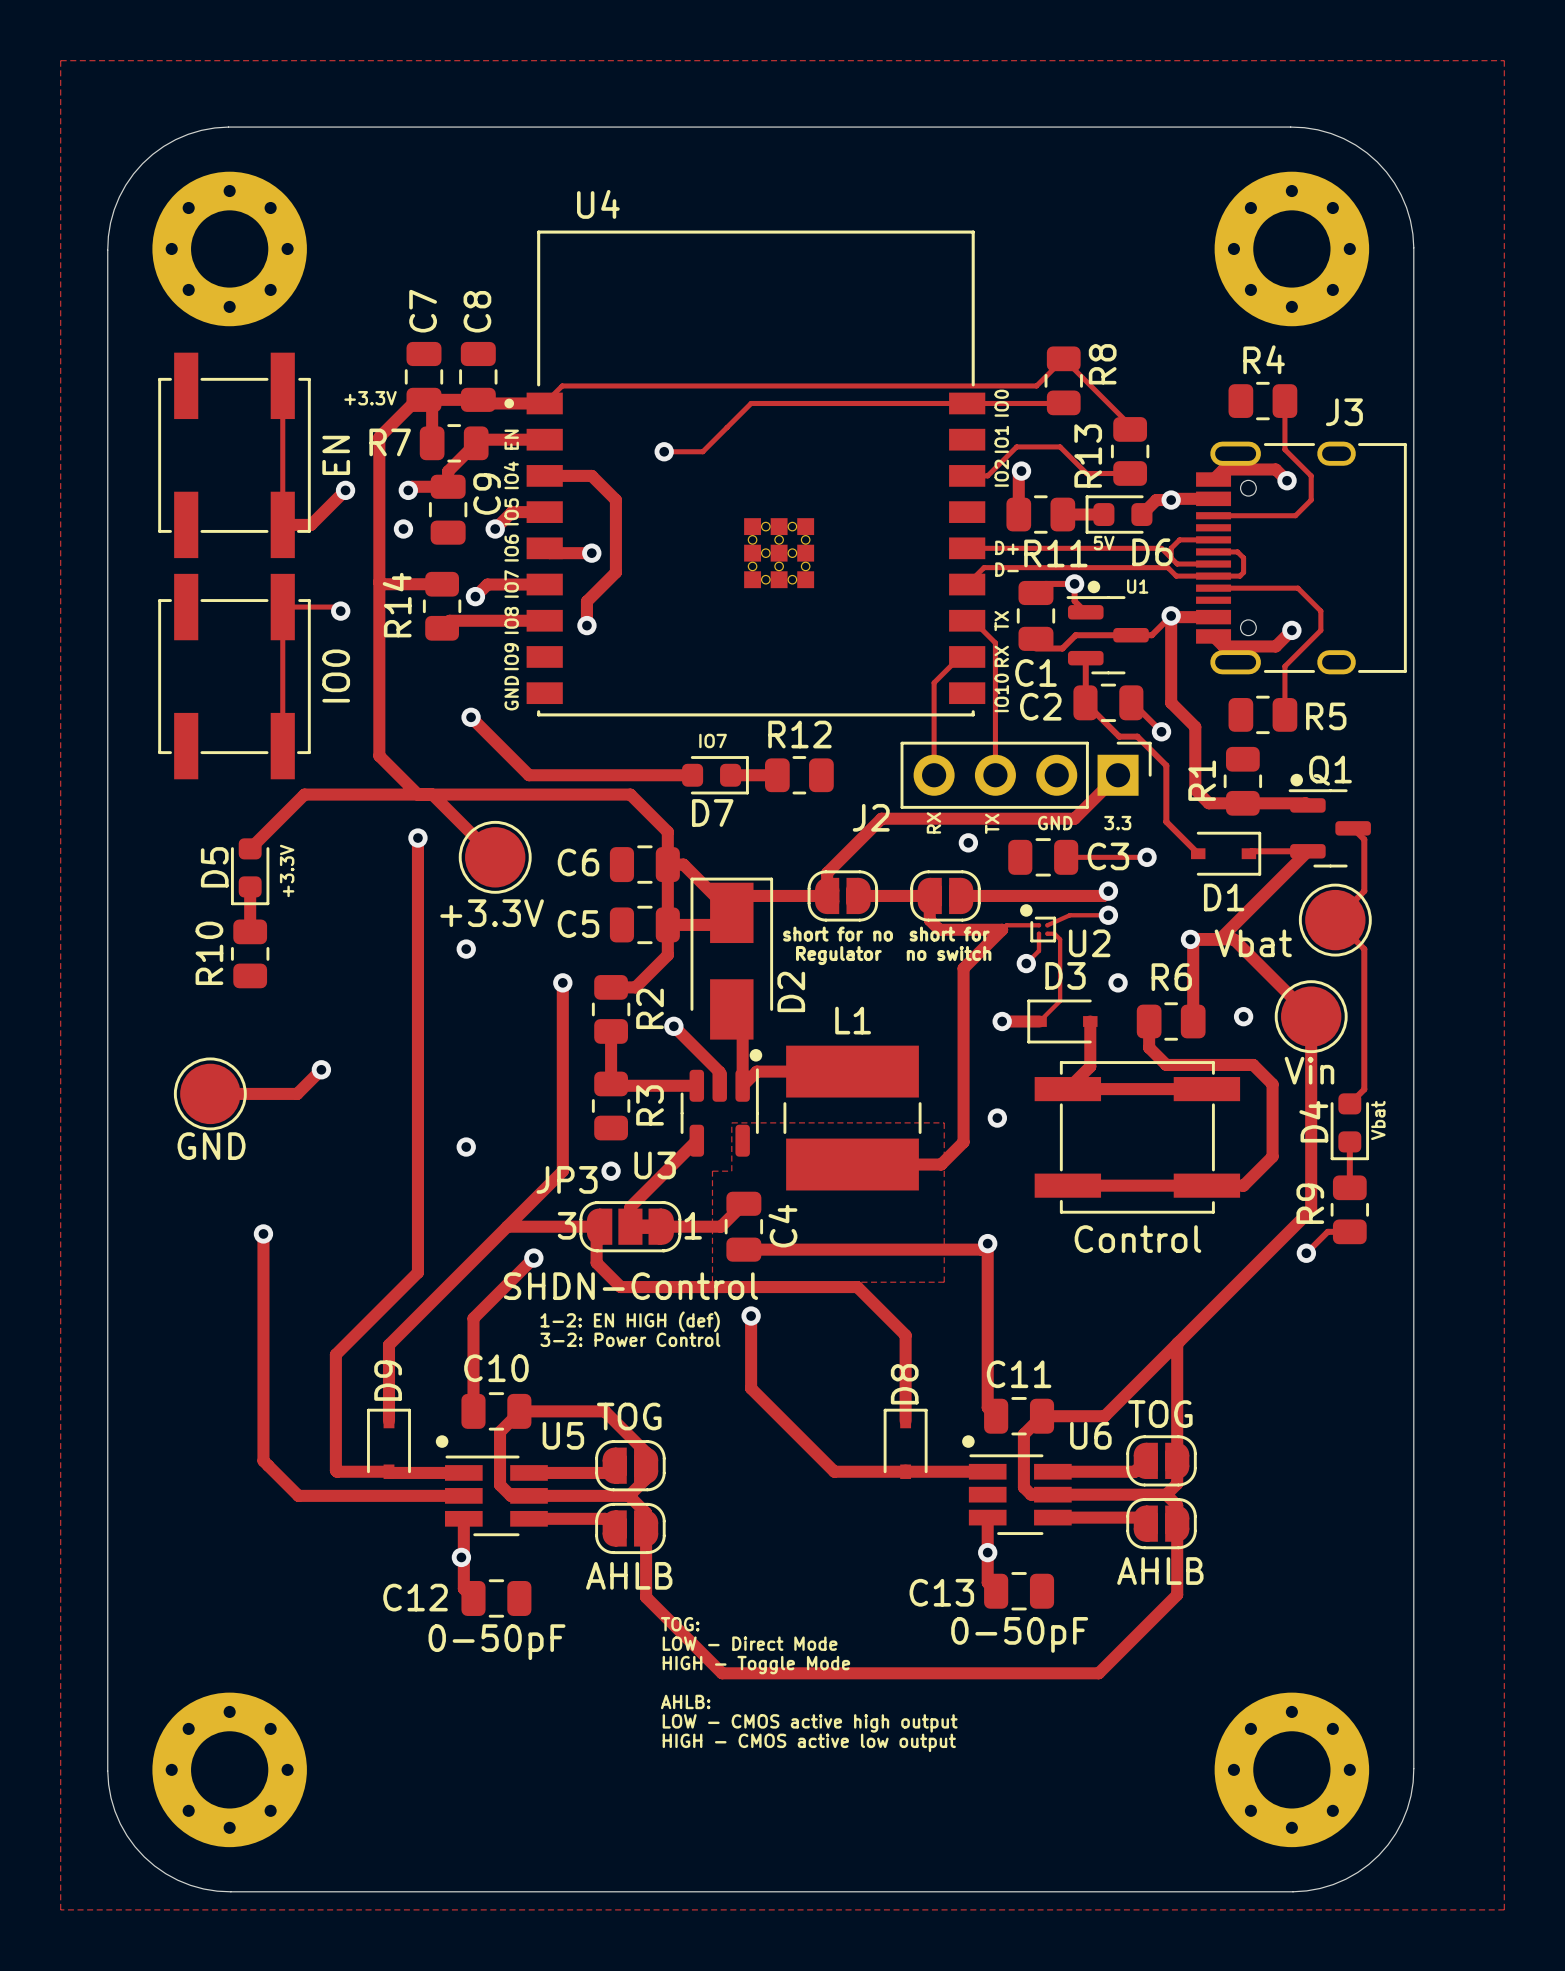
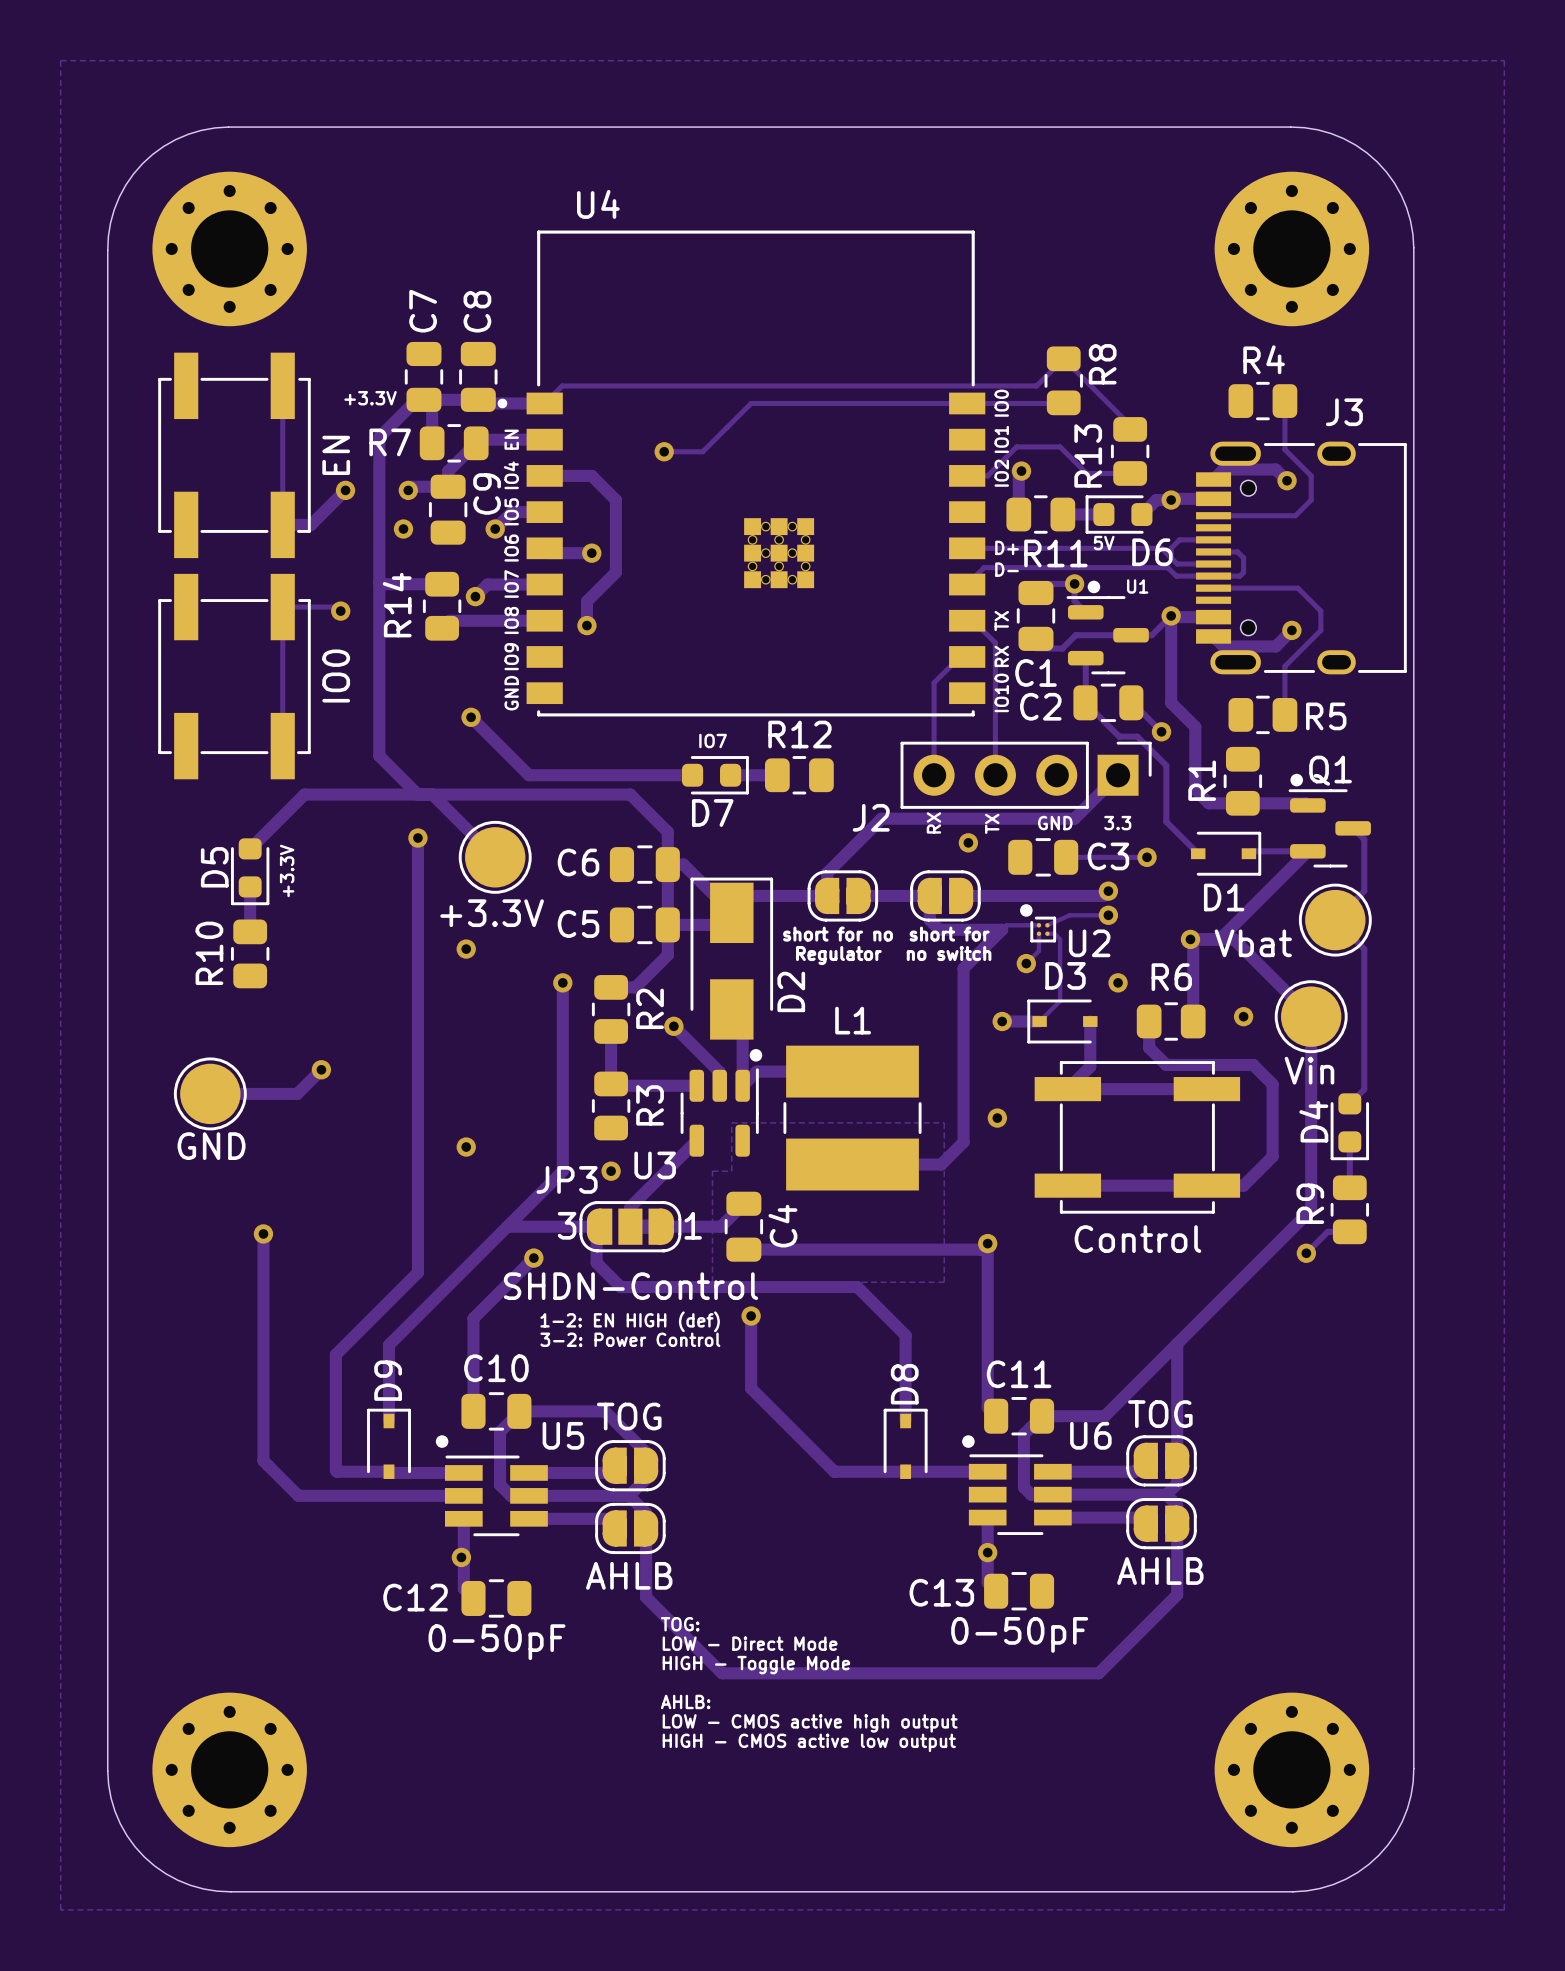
U4 footprint: [504, 230, 986, 717] -> [497, 230, 986, 717]
text: Vbat (1378, 1120) -> none

